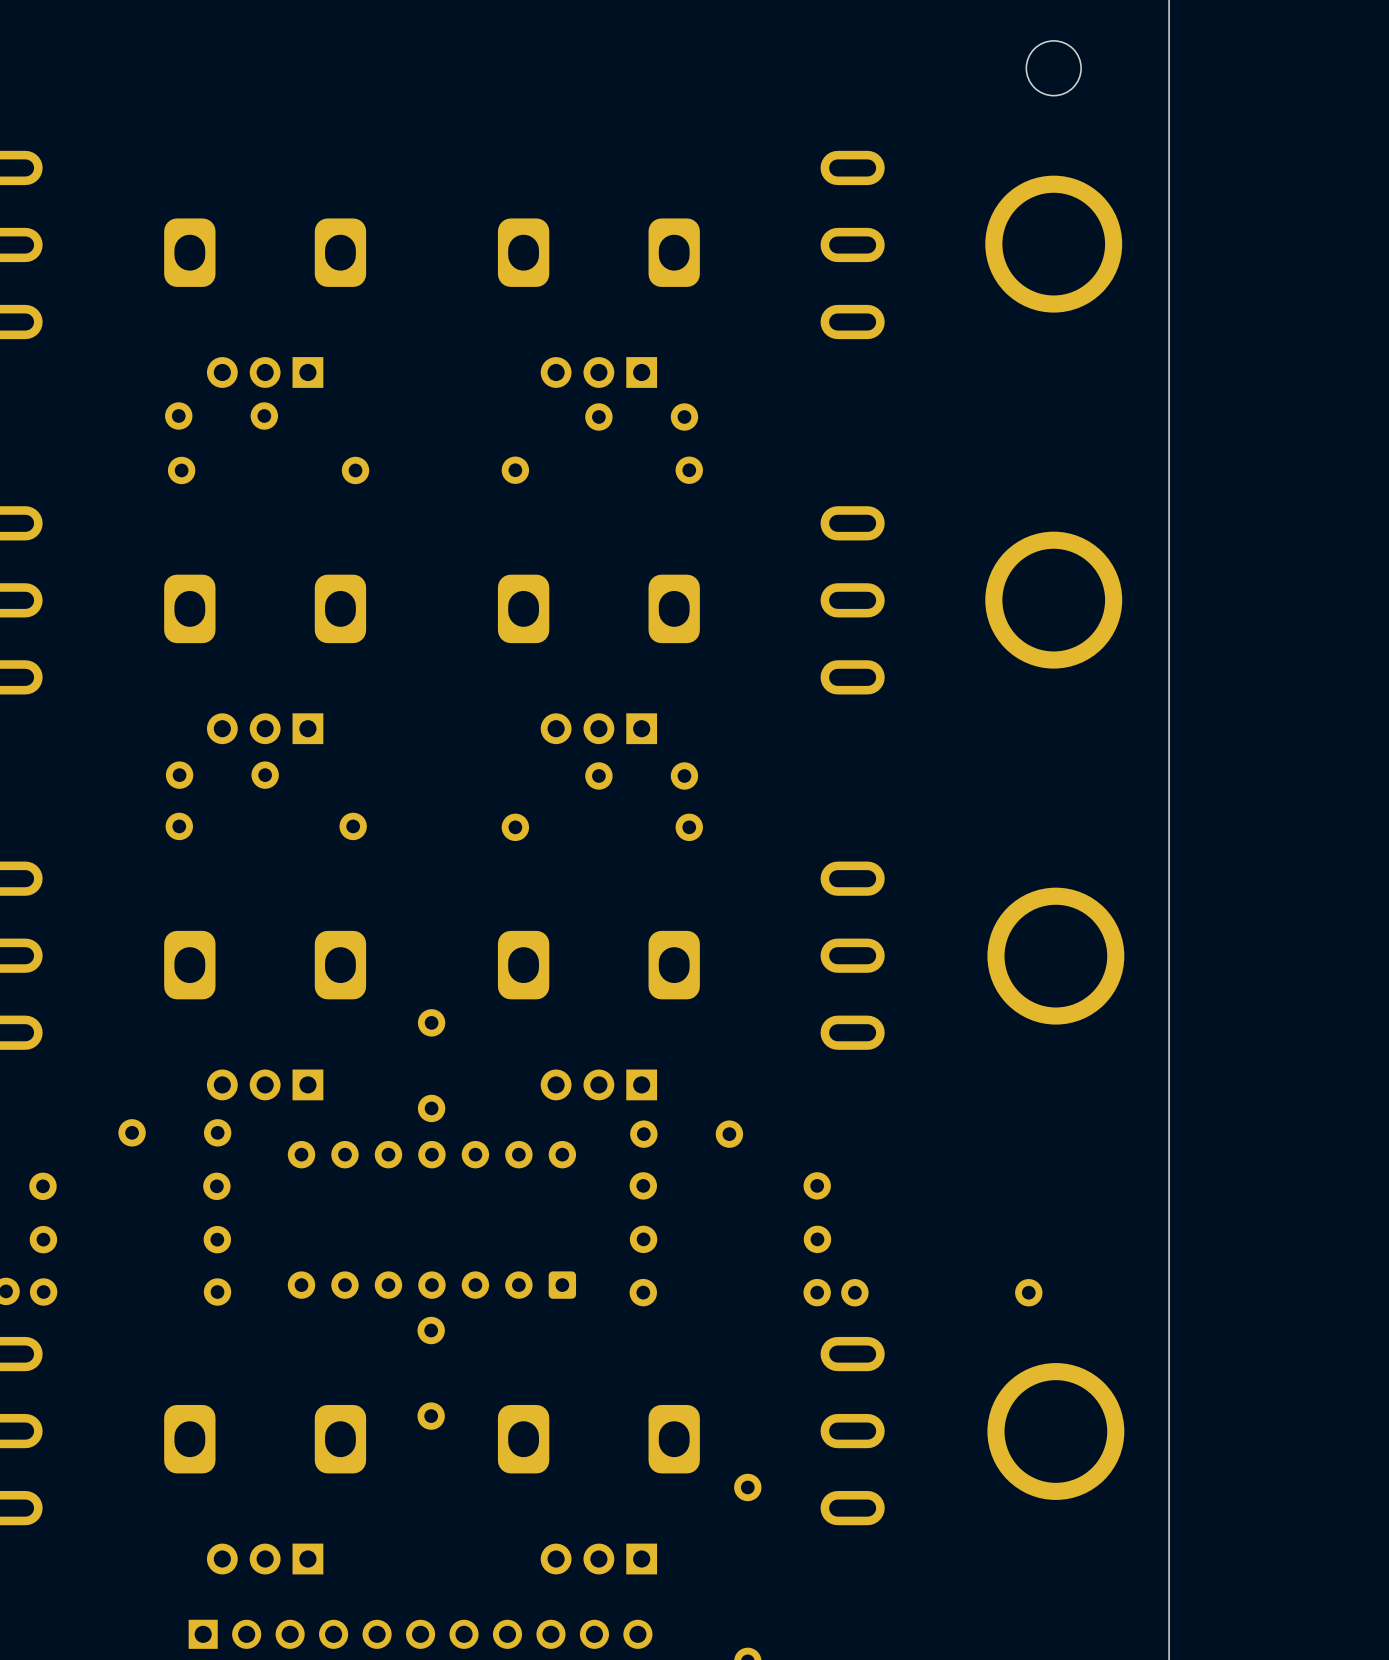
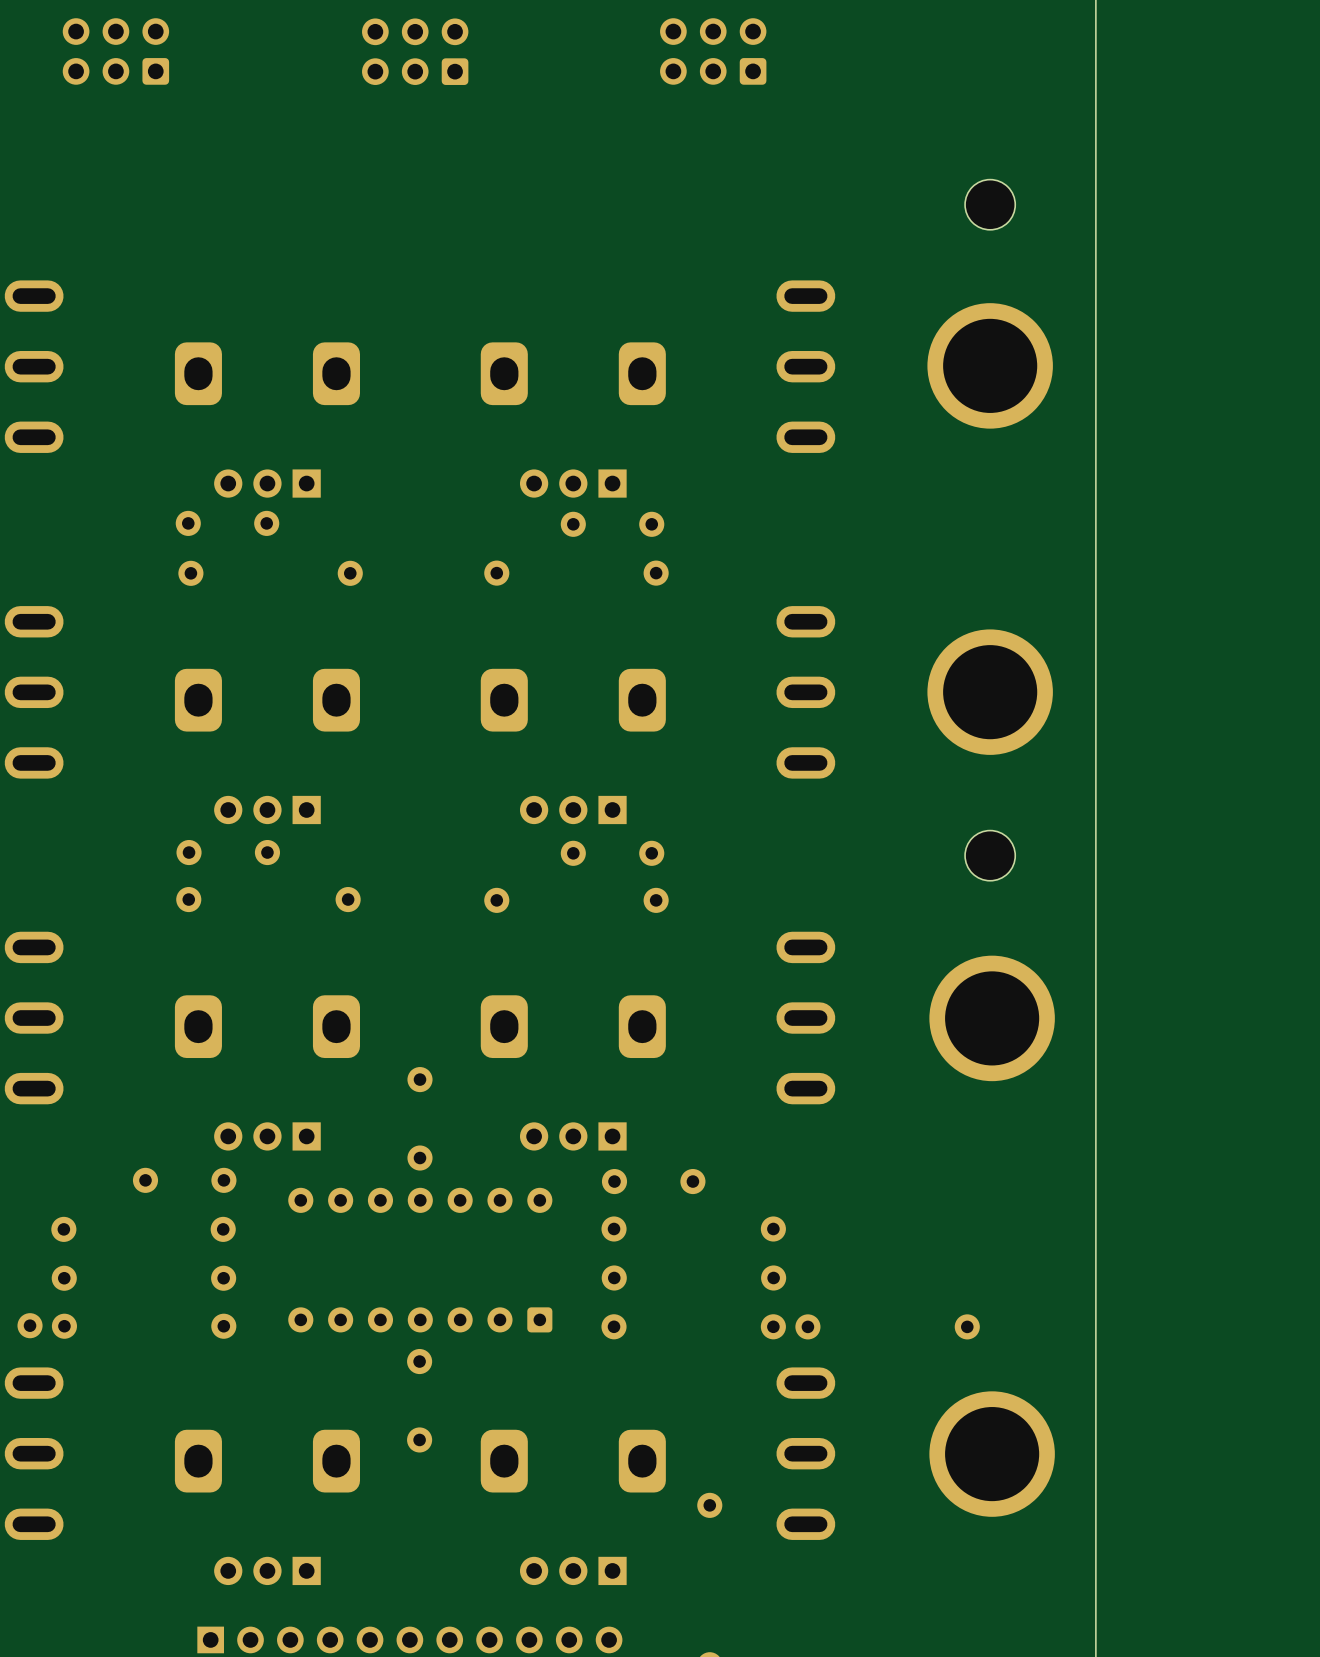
part: none -> (990, 855)

